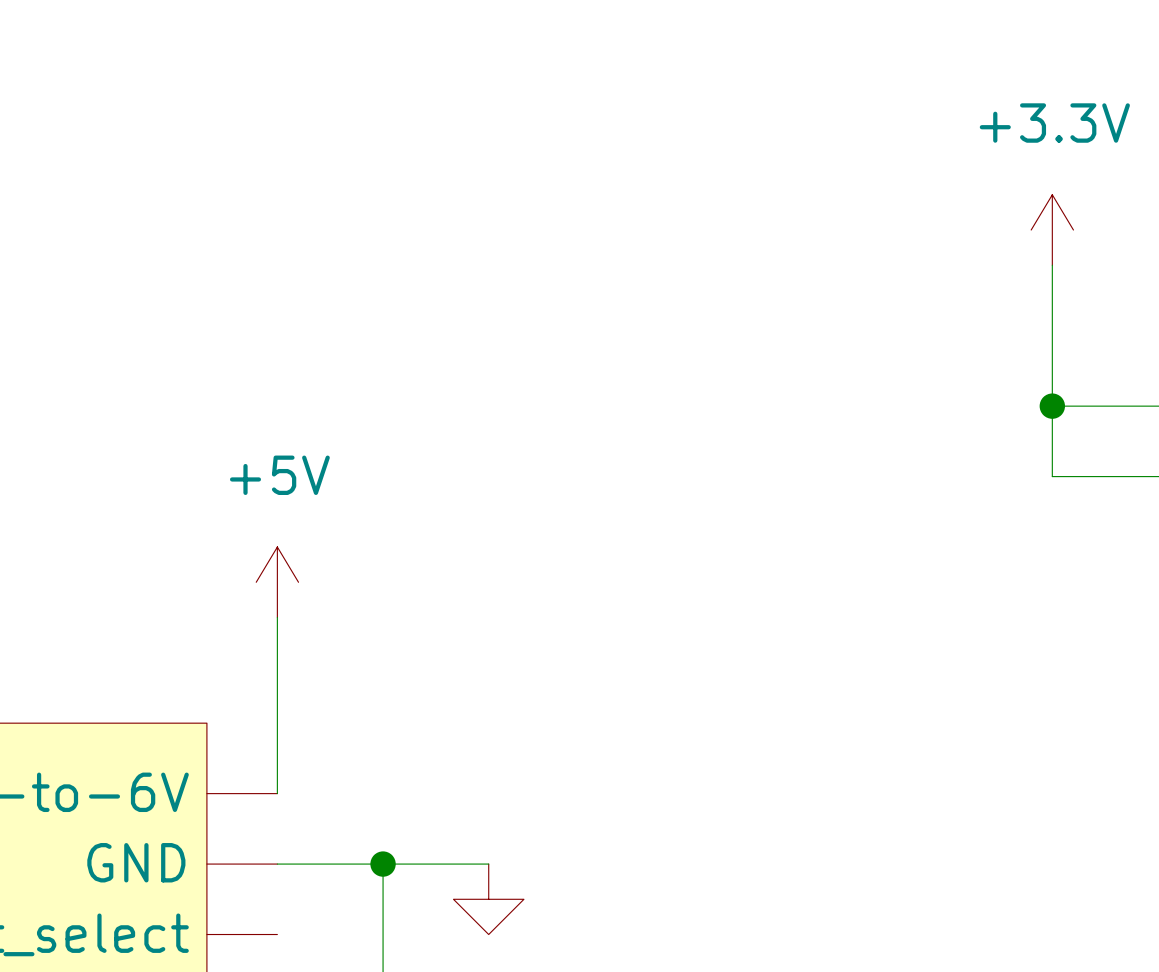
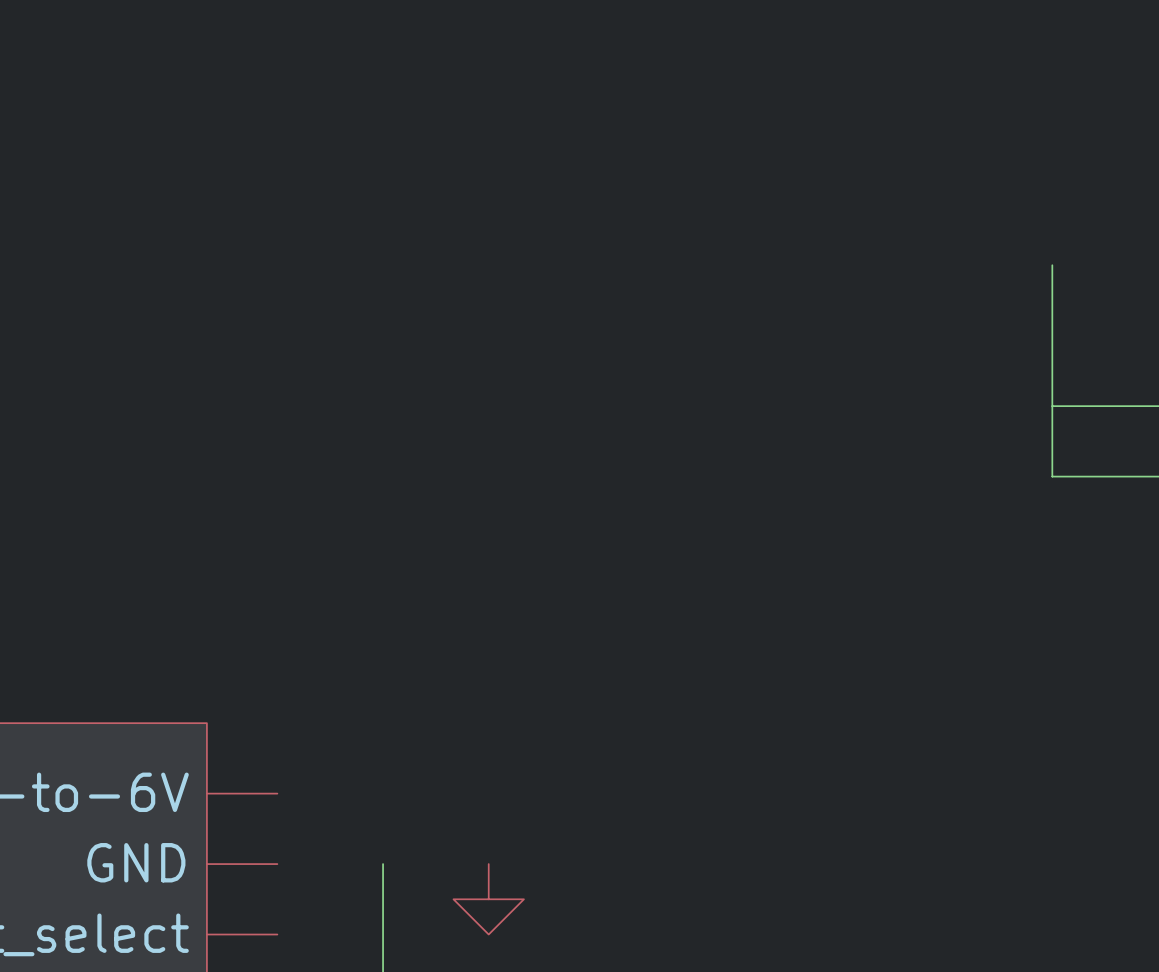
power symbol: +3.3V (1052, 230) -> none
junction: (1052, 406) -> none
power symbol: +5V (277, 582) -> none
wire: (277, 617) (277, 793) -> none
wire: (277, 864) (488, 864) -> none
junction: (383, 864) -> none

